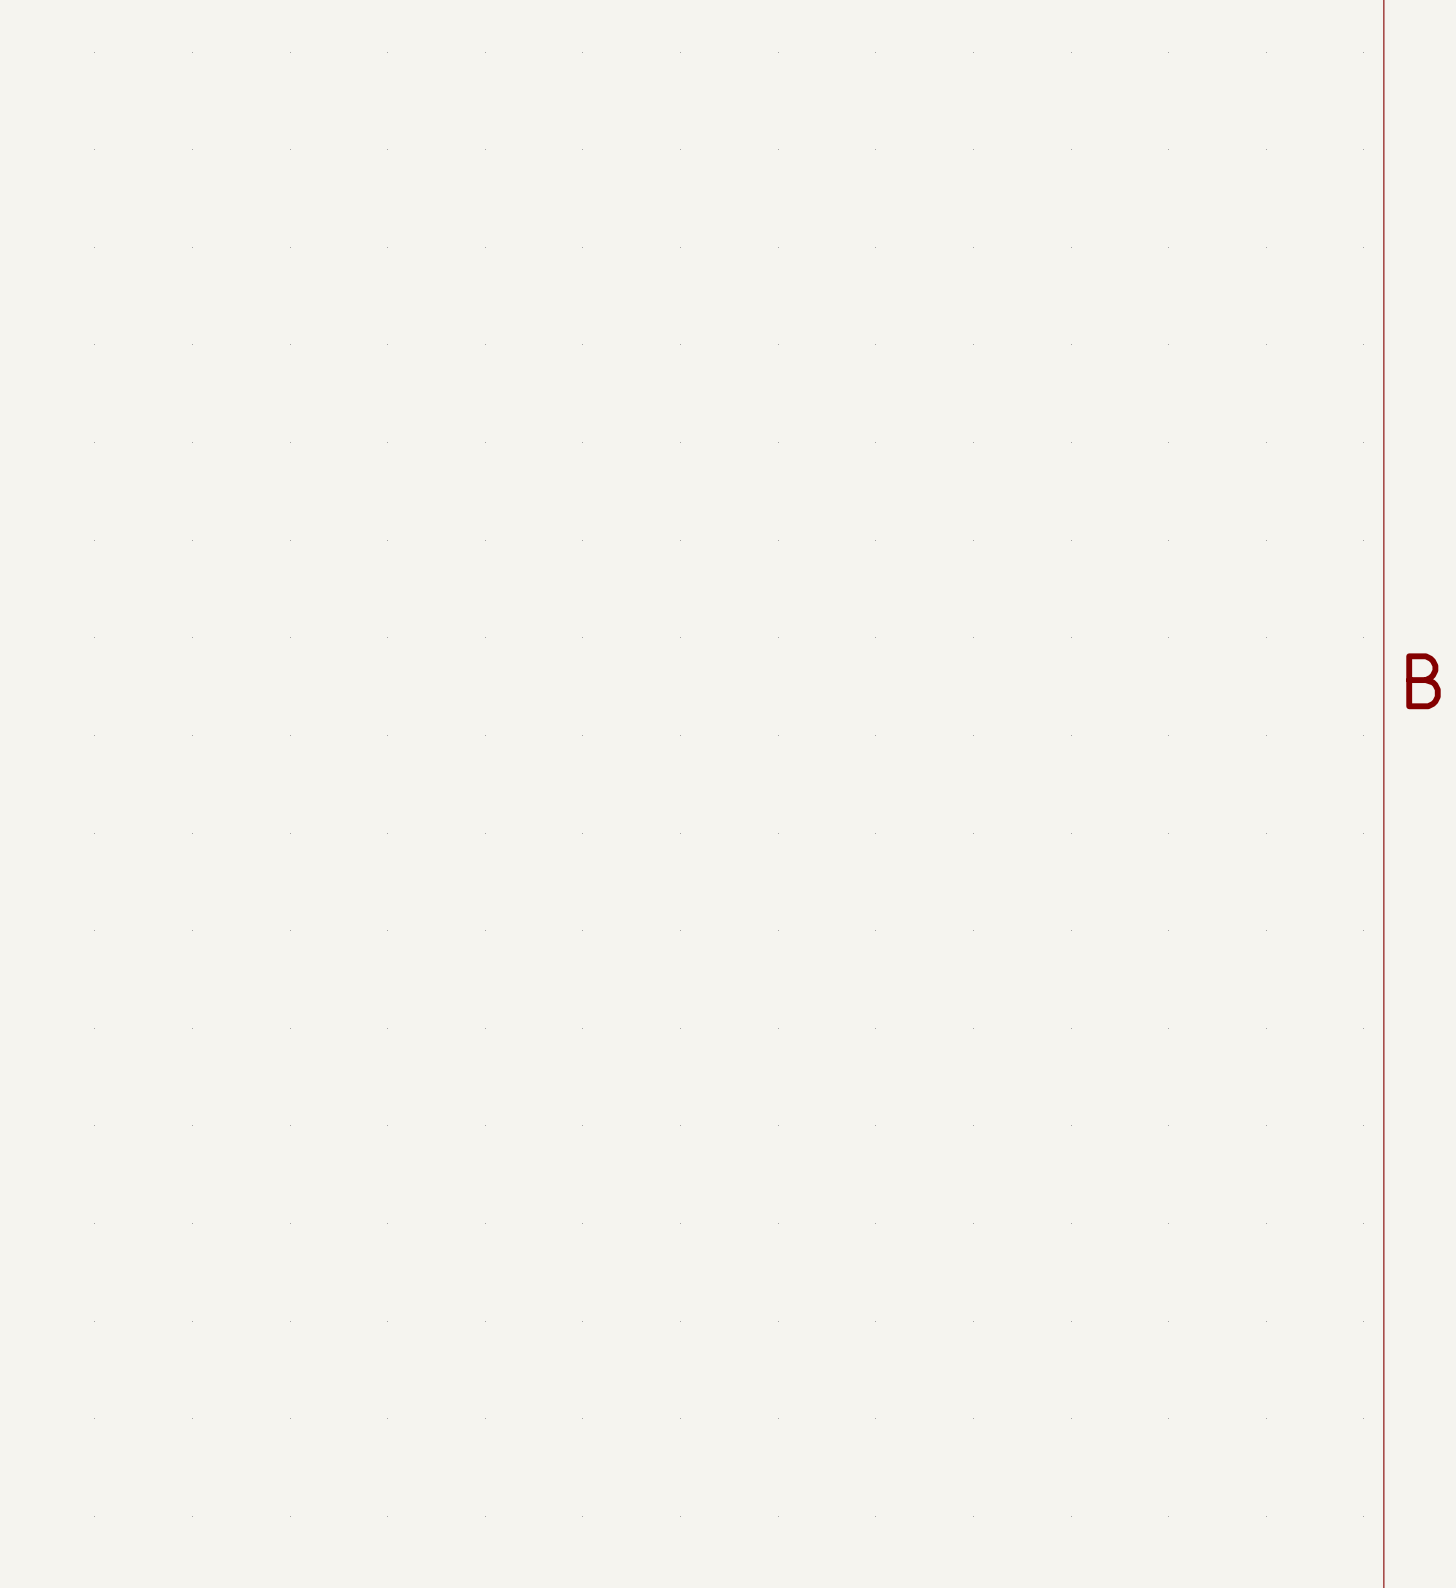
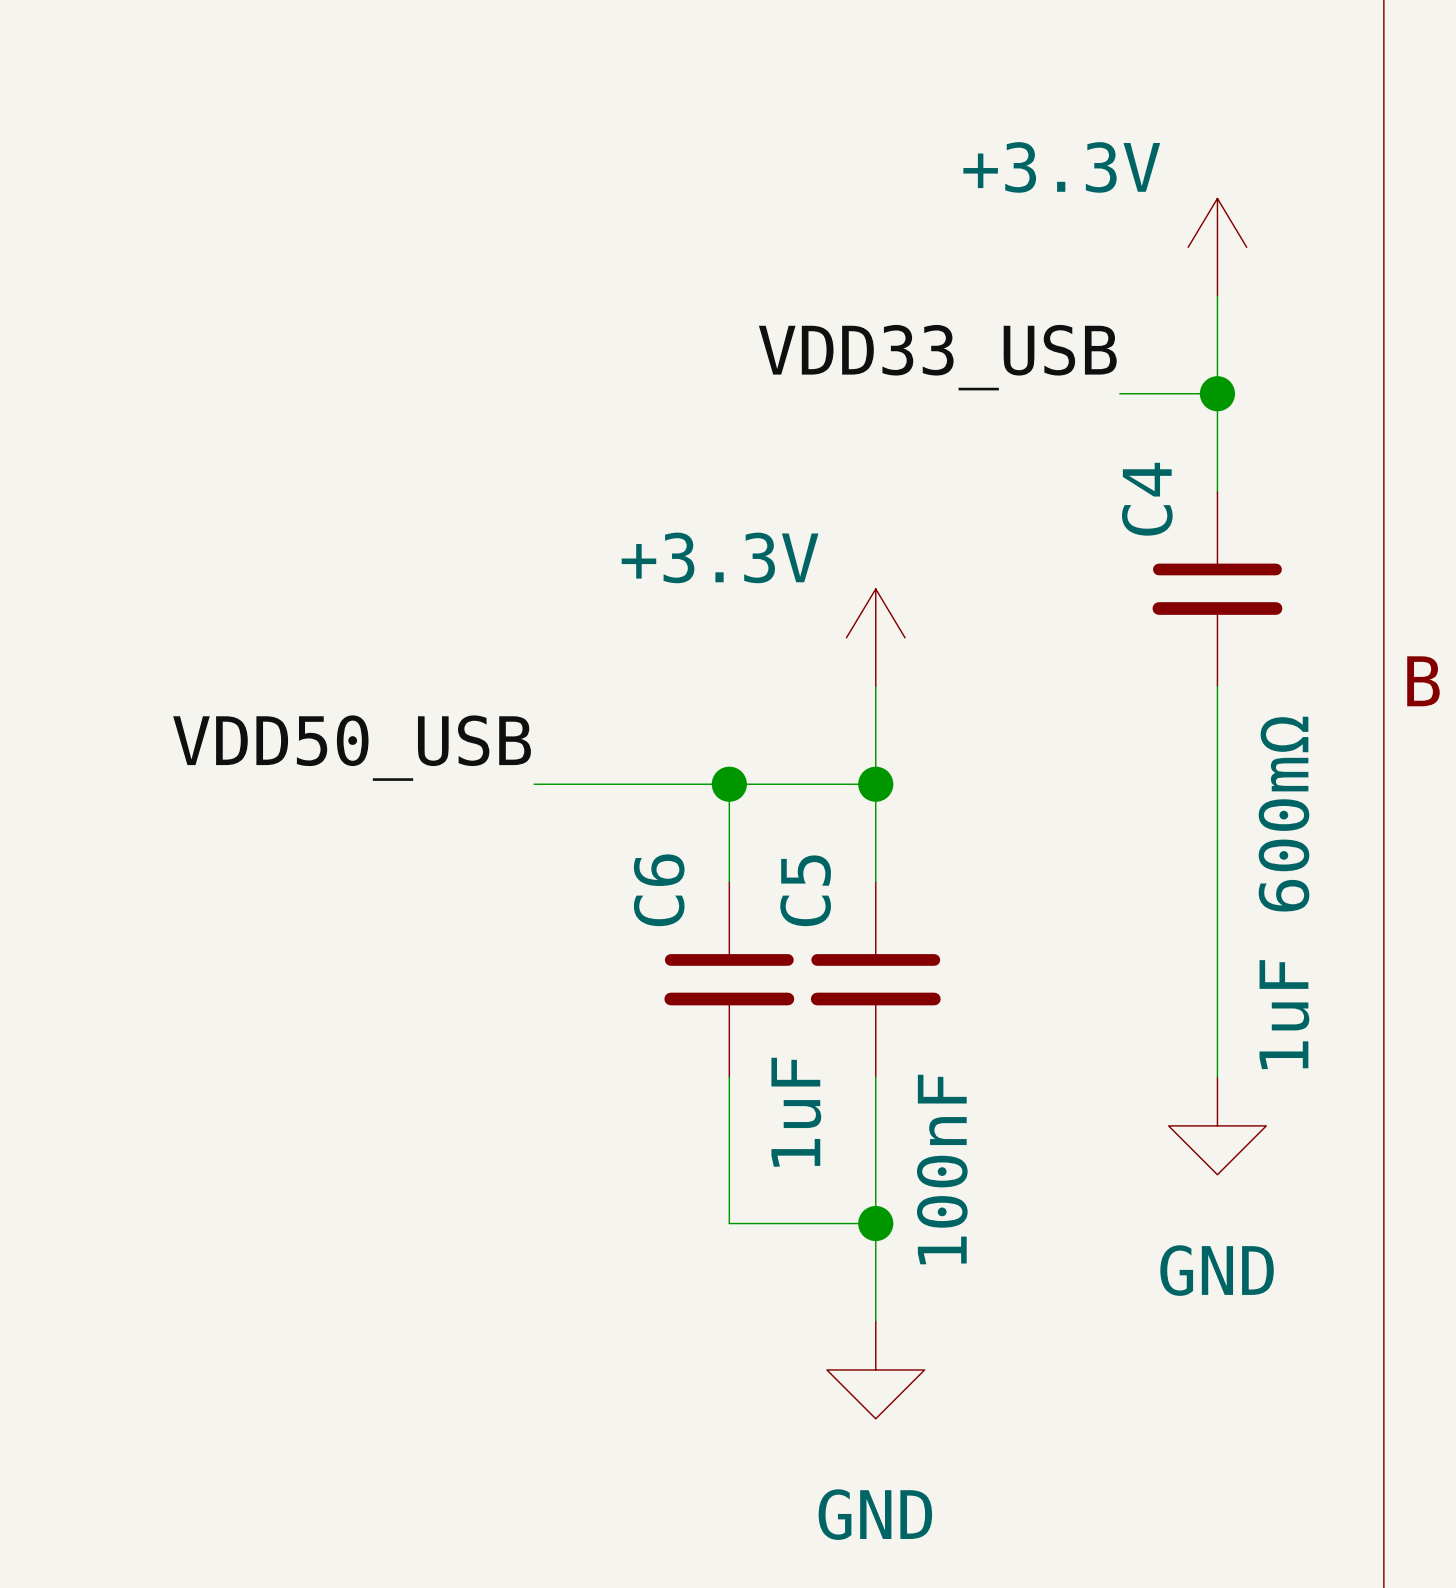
power symbol: none -> +3.3V (1217, 247)
wire: none -> (1217, 296) (1217, 491)
label: none -> VDD33_USB (937, 357)
wire: none -> (1119, 393) (1217, 393)
junction: none -> (1217, 393)
C4: none -> 1uF 600mΩ (1217, 588)
power symbol: none -> +3.3V (875, 637)
wire: none -> (875, 686) (875, 881)
wire: none -> (1217, 686) (1217, 1077)
label: none -> VDD50_USB (352, 748)
wire: none -> (534, 784) (875, 784)
wire: none -> (729, 784) (729, 881)
junction: none -> (729, 784)
junction: none -> (875, 784)
C6: none -> 1uF (729, 979)
C5: none -> 100nF (875, 979)
wire: none -> (729, 1077) (729, 1223) (875, 1223)
wire: none -> (875, 1077) (875, 1321)
power symbol: none -> GND (1217, 1125)
junction: none -> (875, 1223)
power symbol: none -> GND (875, 1369)

